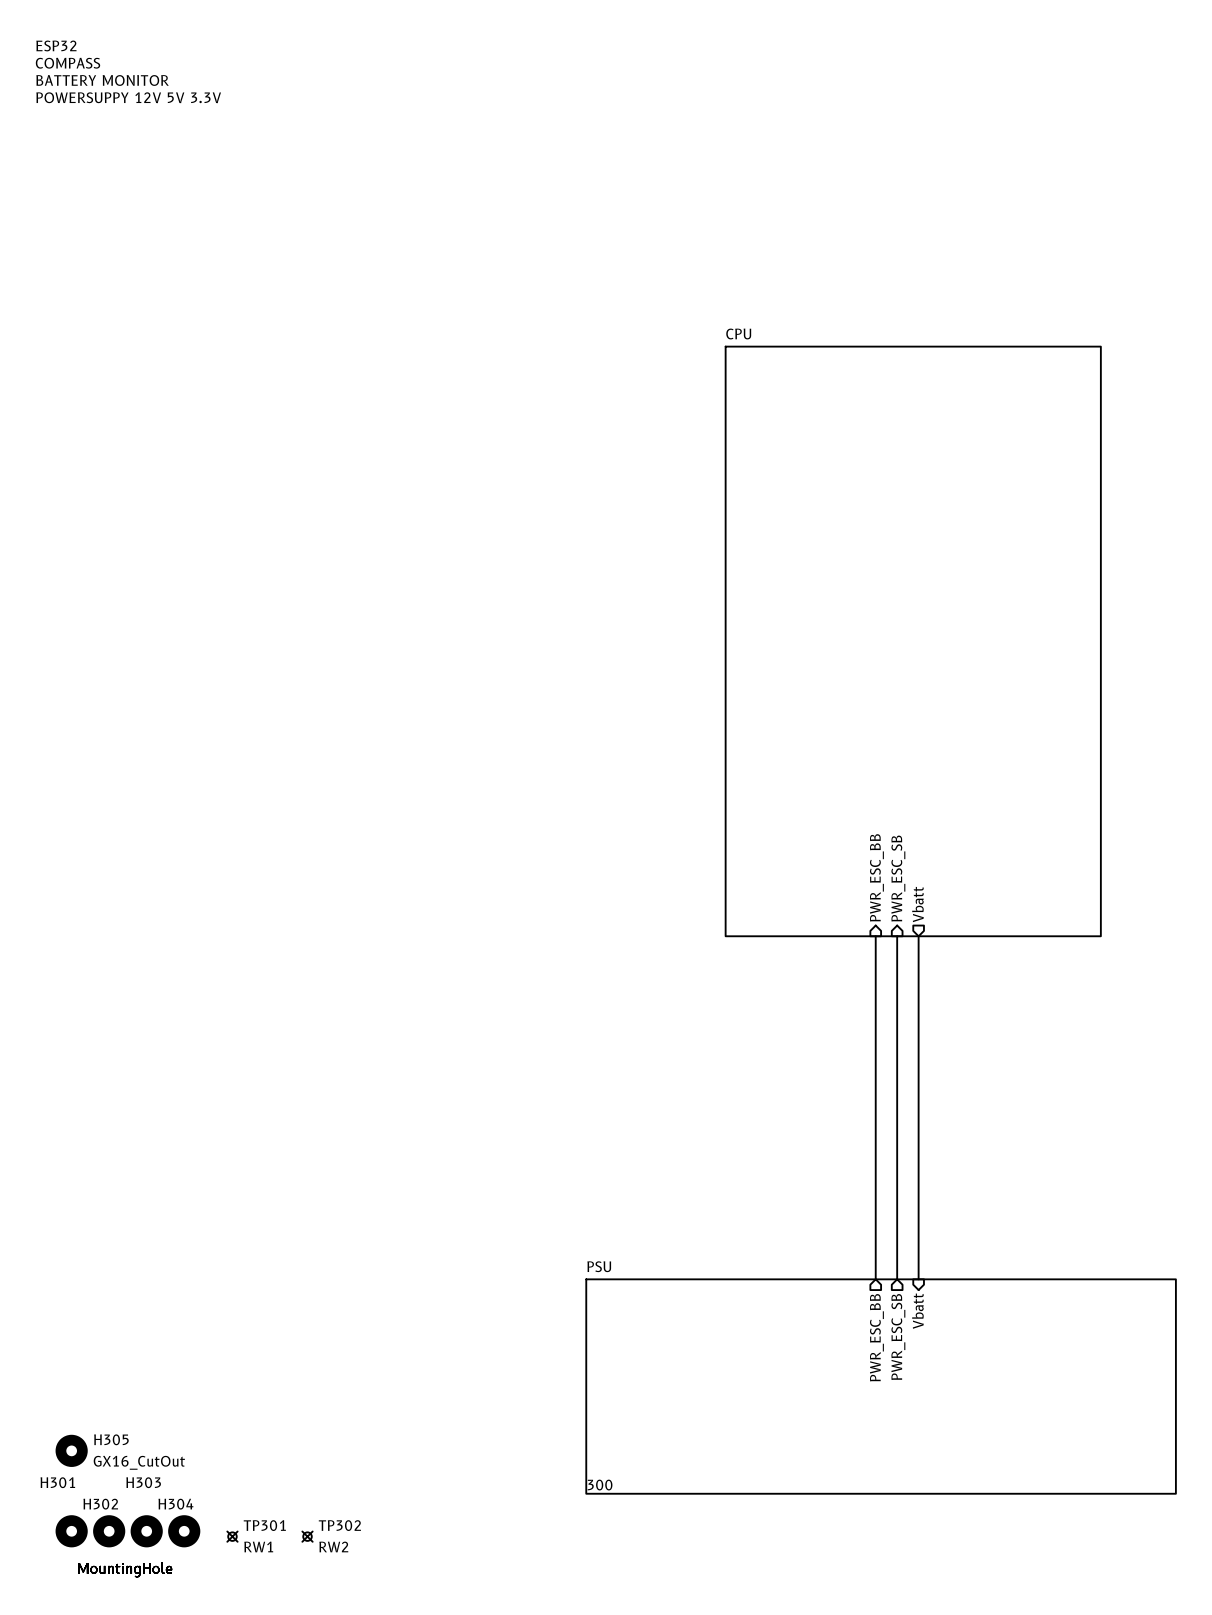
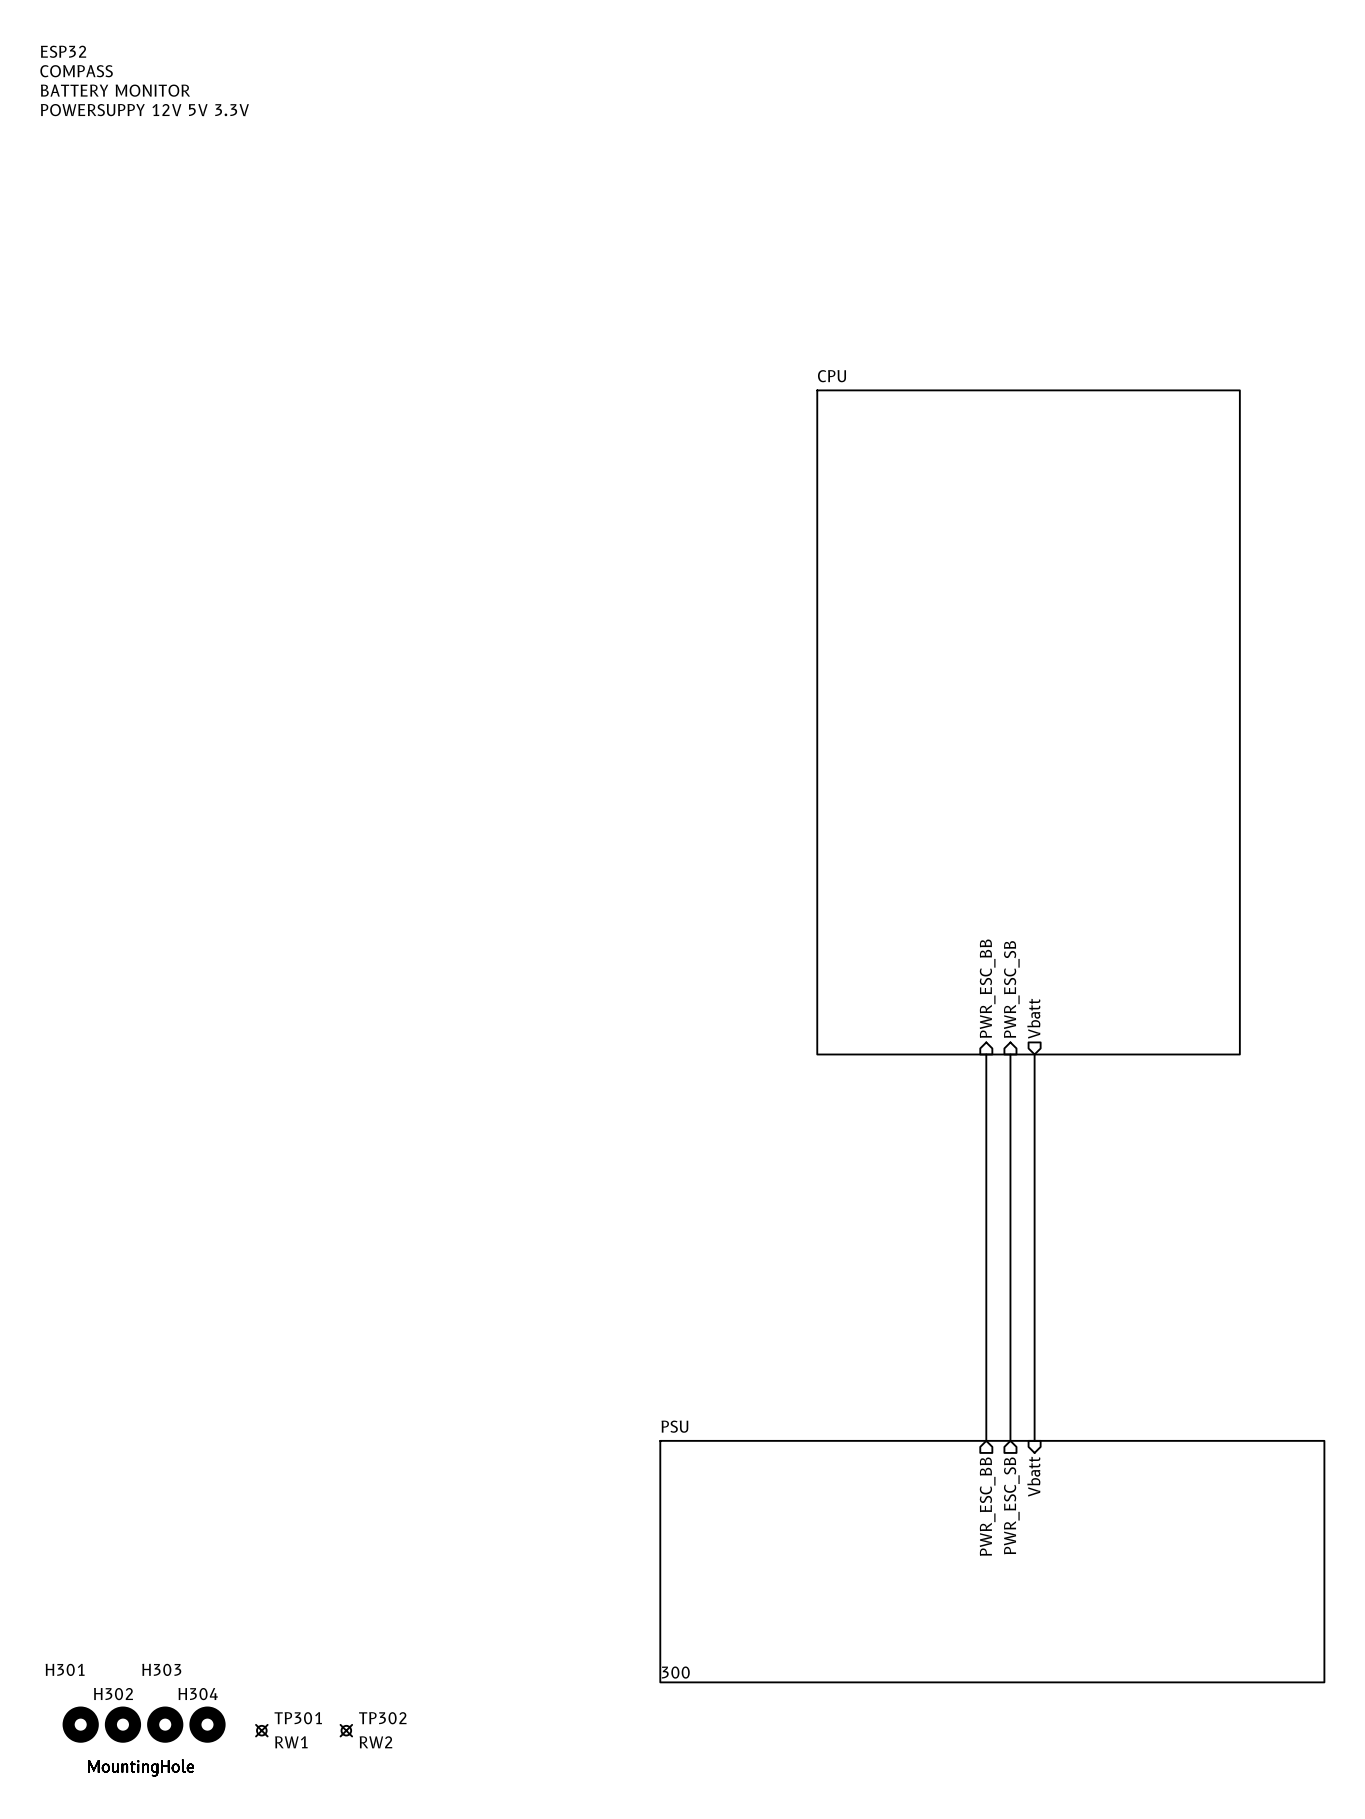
H305: GX16_CutOut (71, 1450) -> none

